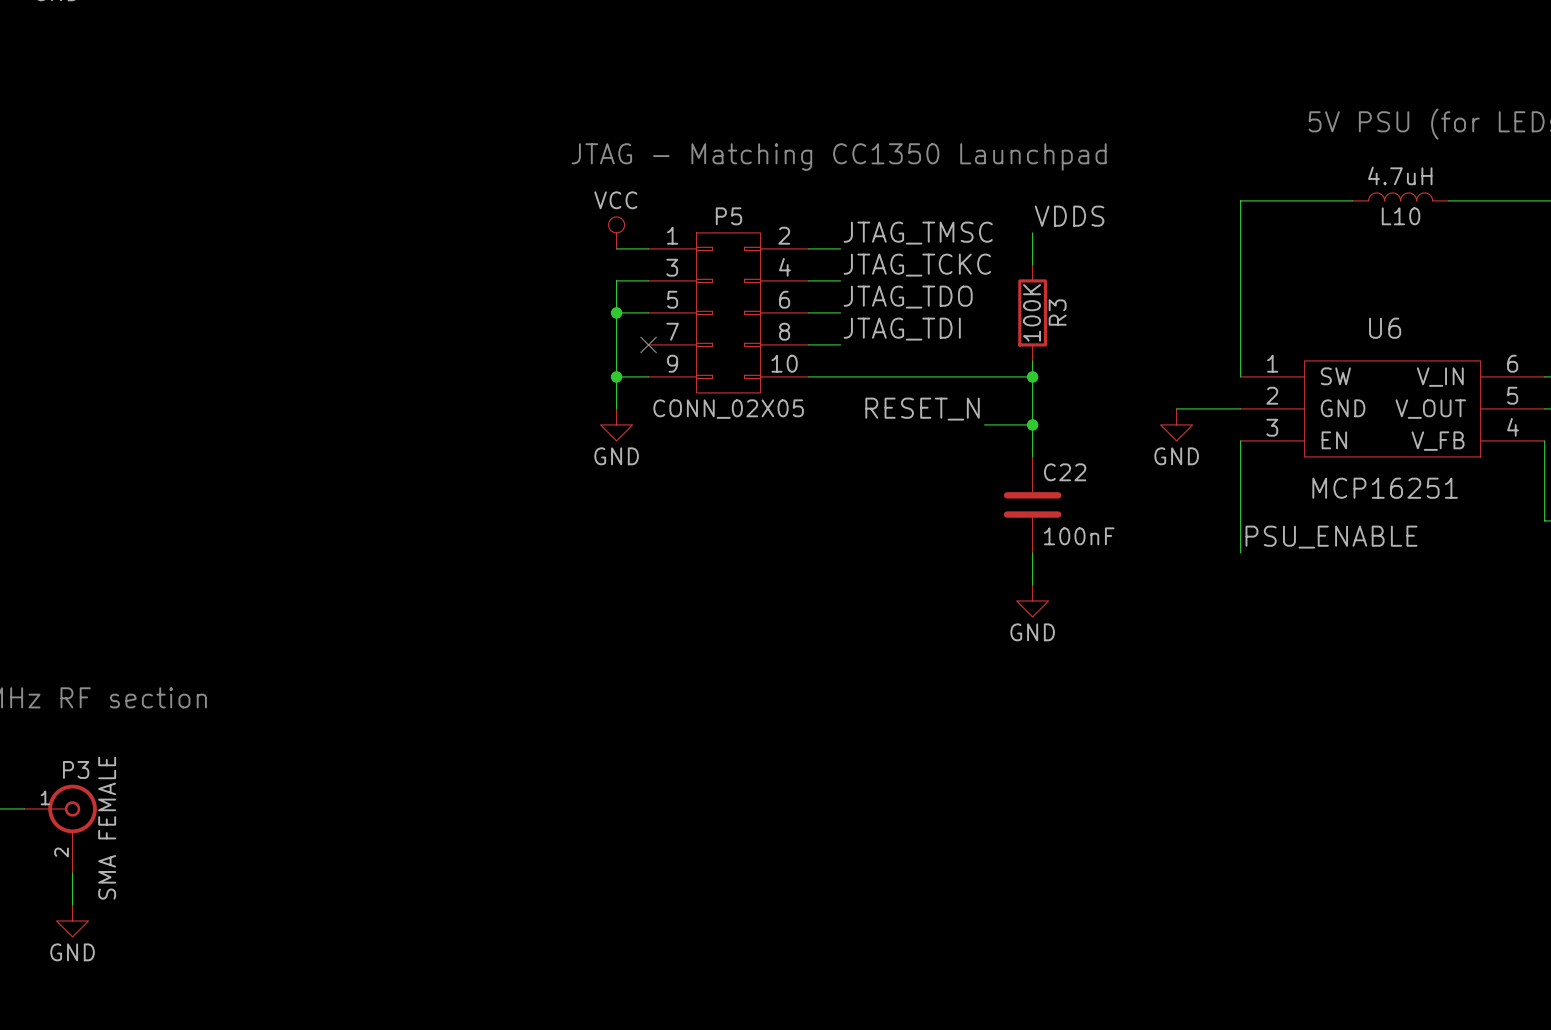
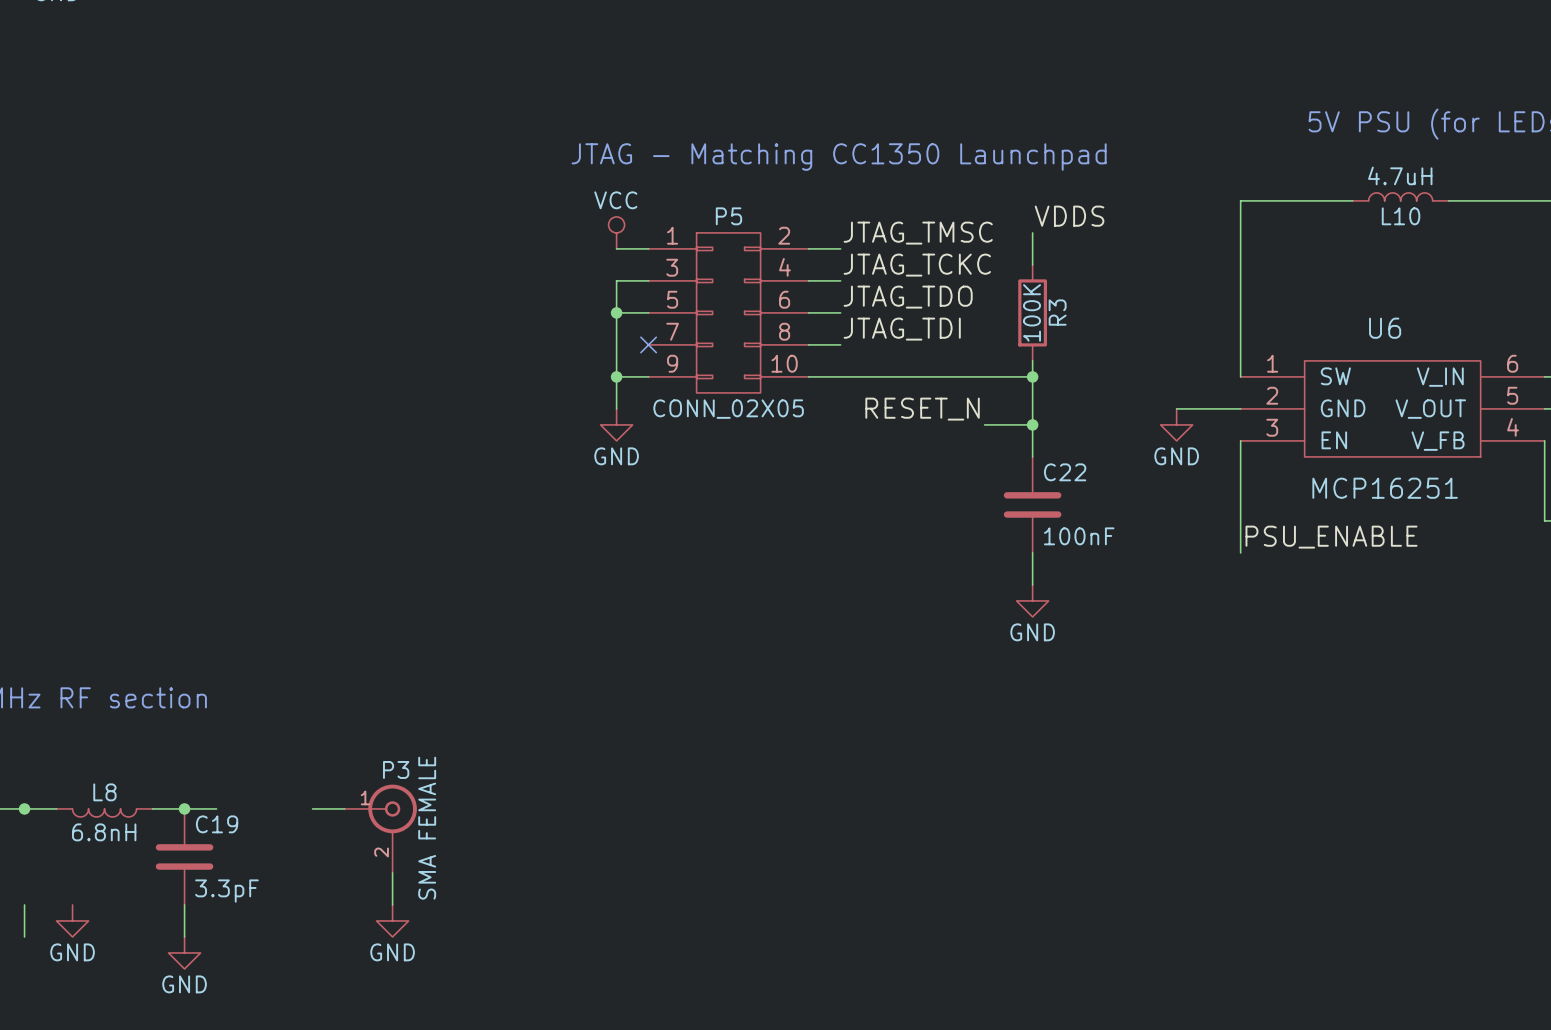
junction: none -> (24, 808)
wire: none -> (152, 808) (216, 808)
junction: none -> (184, 808)
wire: none -> (312, 808) (344, 808)
L8: none -> 6.8nH (104, 812)
P3 position: (60, 828) -> (380, 828)
C19: none -> 3.3pF (184, 856)
wire: (72, 872) (72, 904) -> (24, 904) (24, 936)
wire: none -> (392, 872) (392, 904)
wire: none -> (184, 904) (184, 936)
power symbol: none -> GND (392, 920)
power symbol: none -> GND (184, 952)

